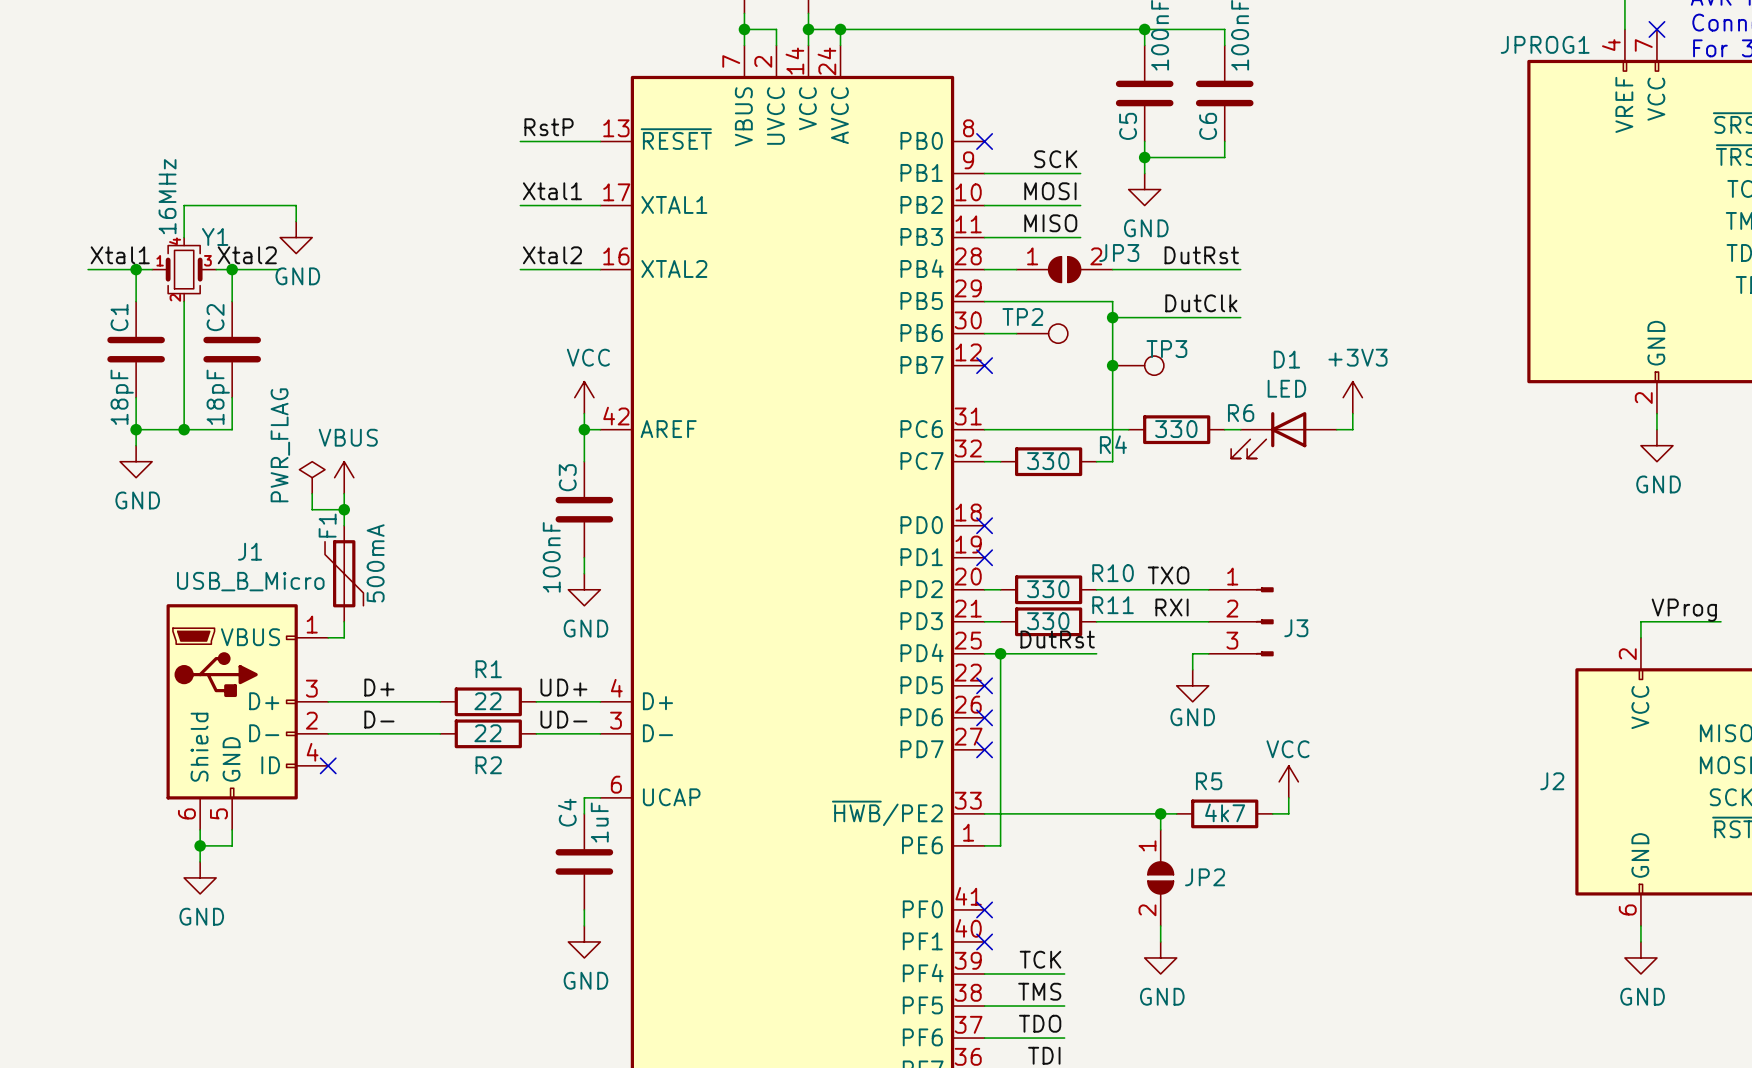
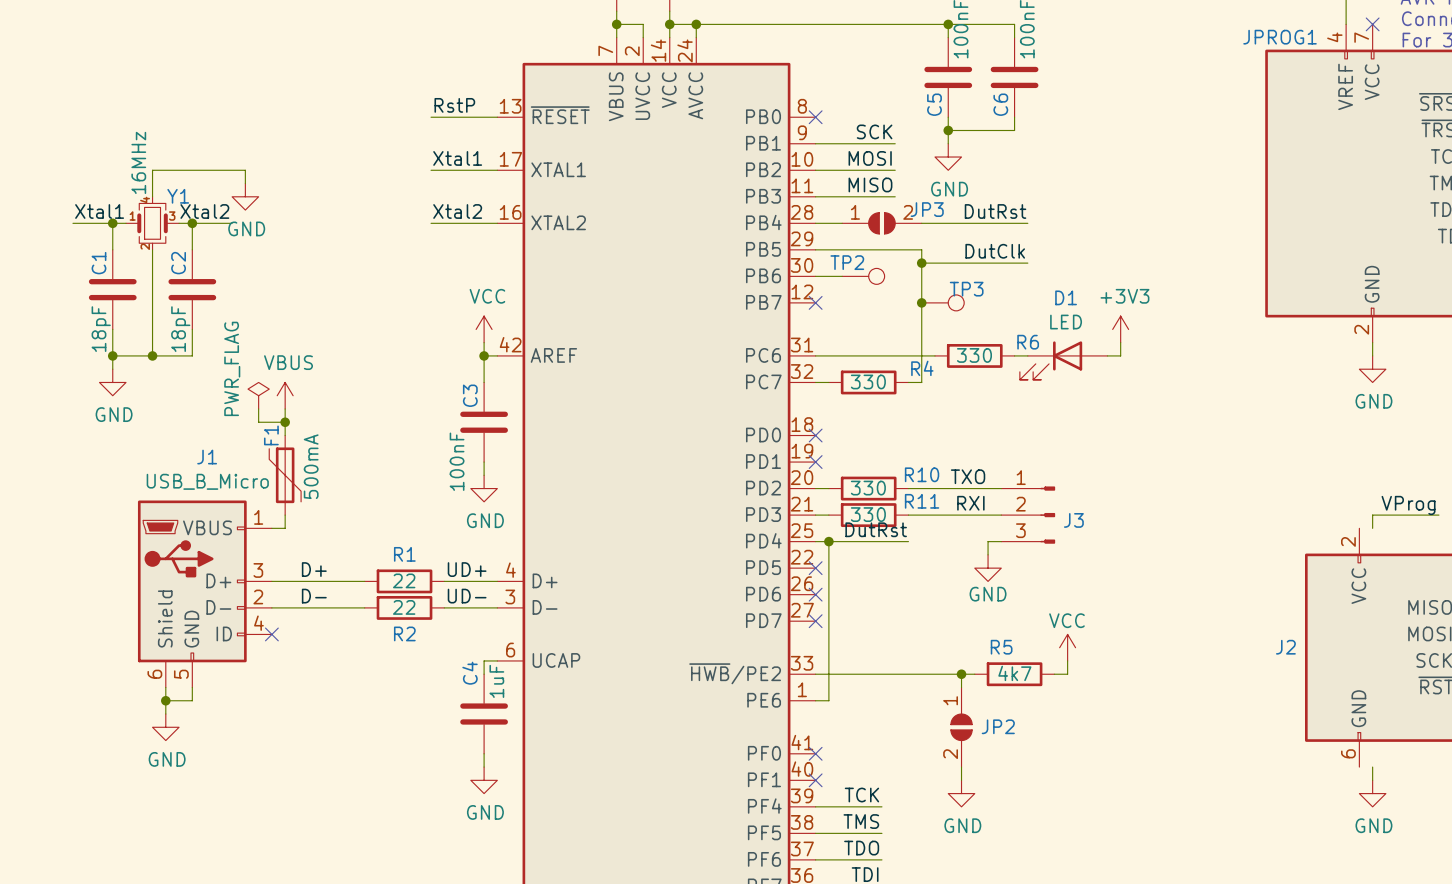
label position: VProg (1684, 610) -> VProg (1408, 505)
wire: (1656, 621) (1640, 621) (1640, 637) -> (1372, 515) (1372, 528)
wire: none -> (1425, 515) (1438, 515)
wire: (1640, 925) (1640, 941) -> (1372, 767) (1372, 780)
power symbol position: GND (1640, 957) -> GND (1372, 793)

